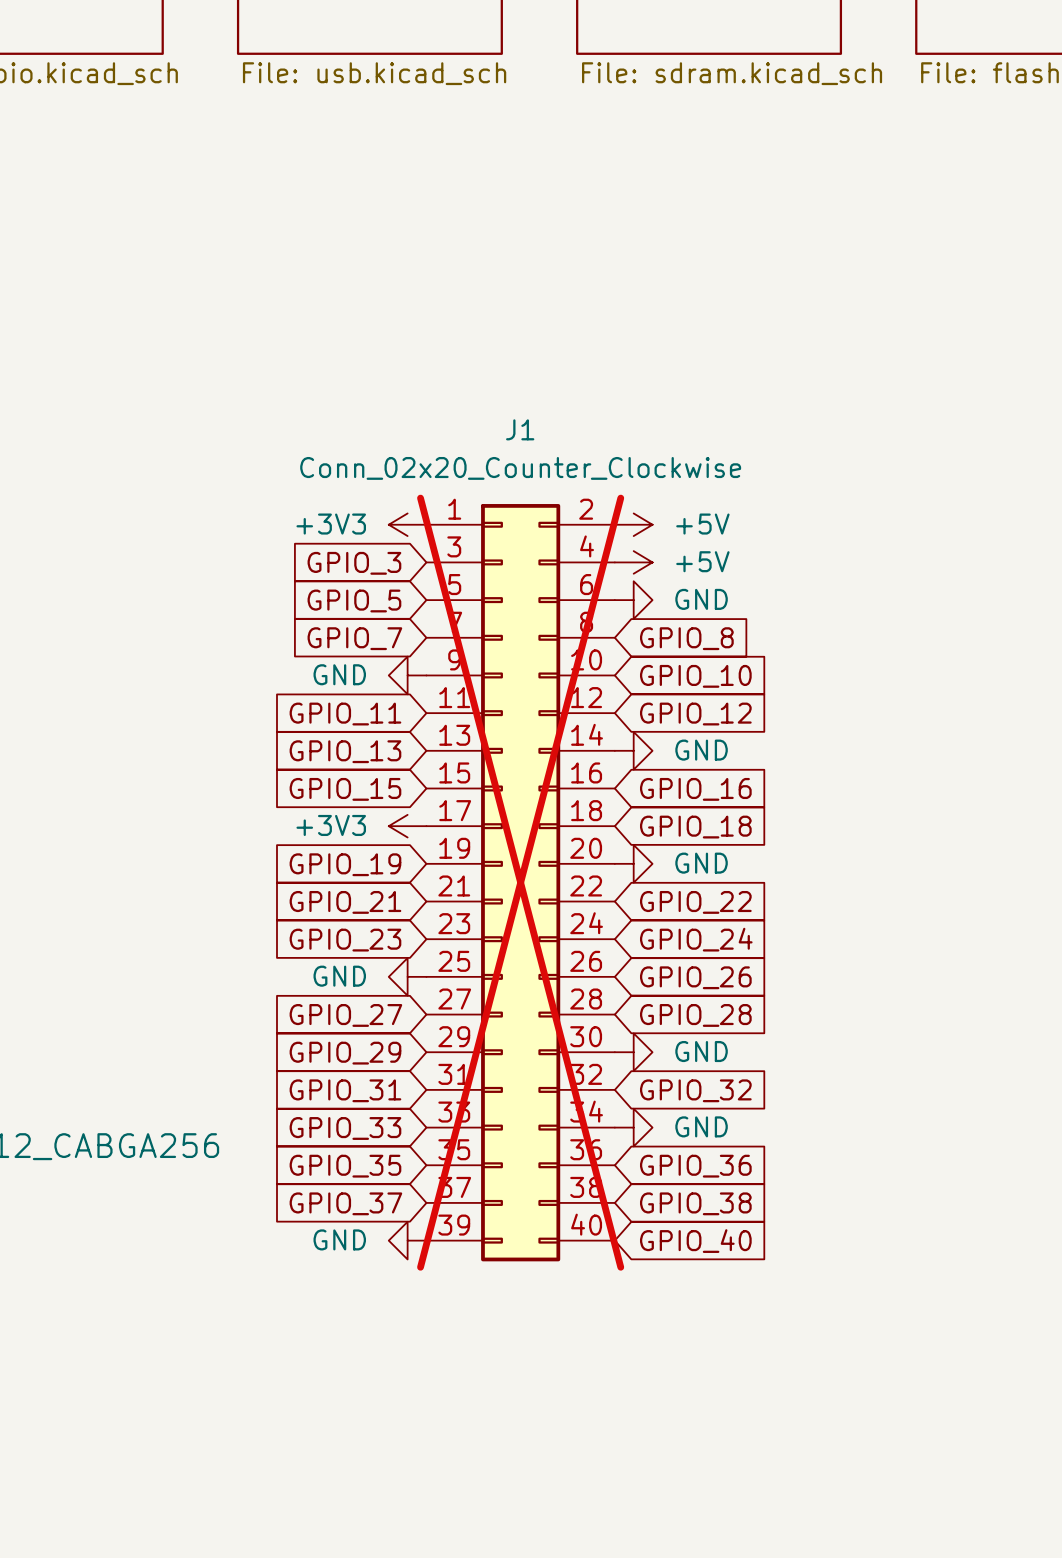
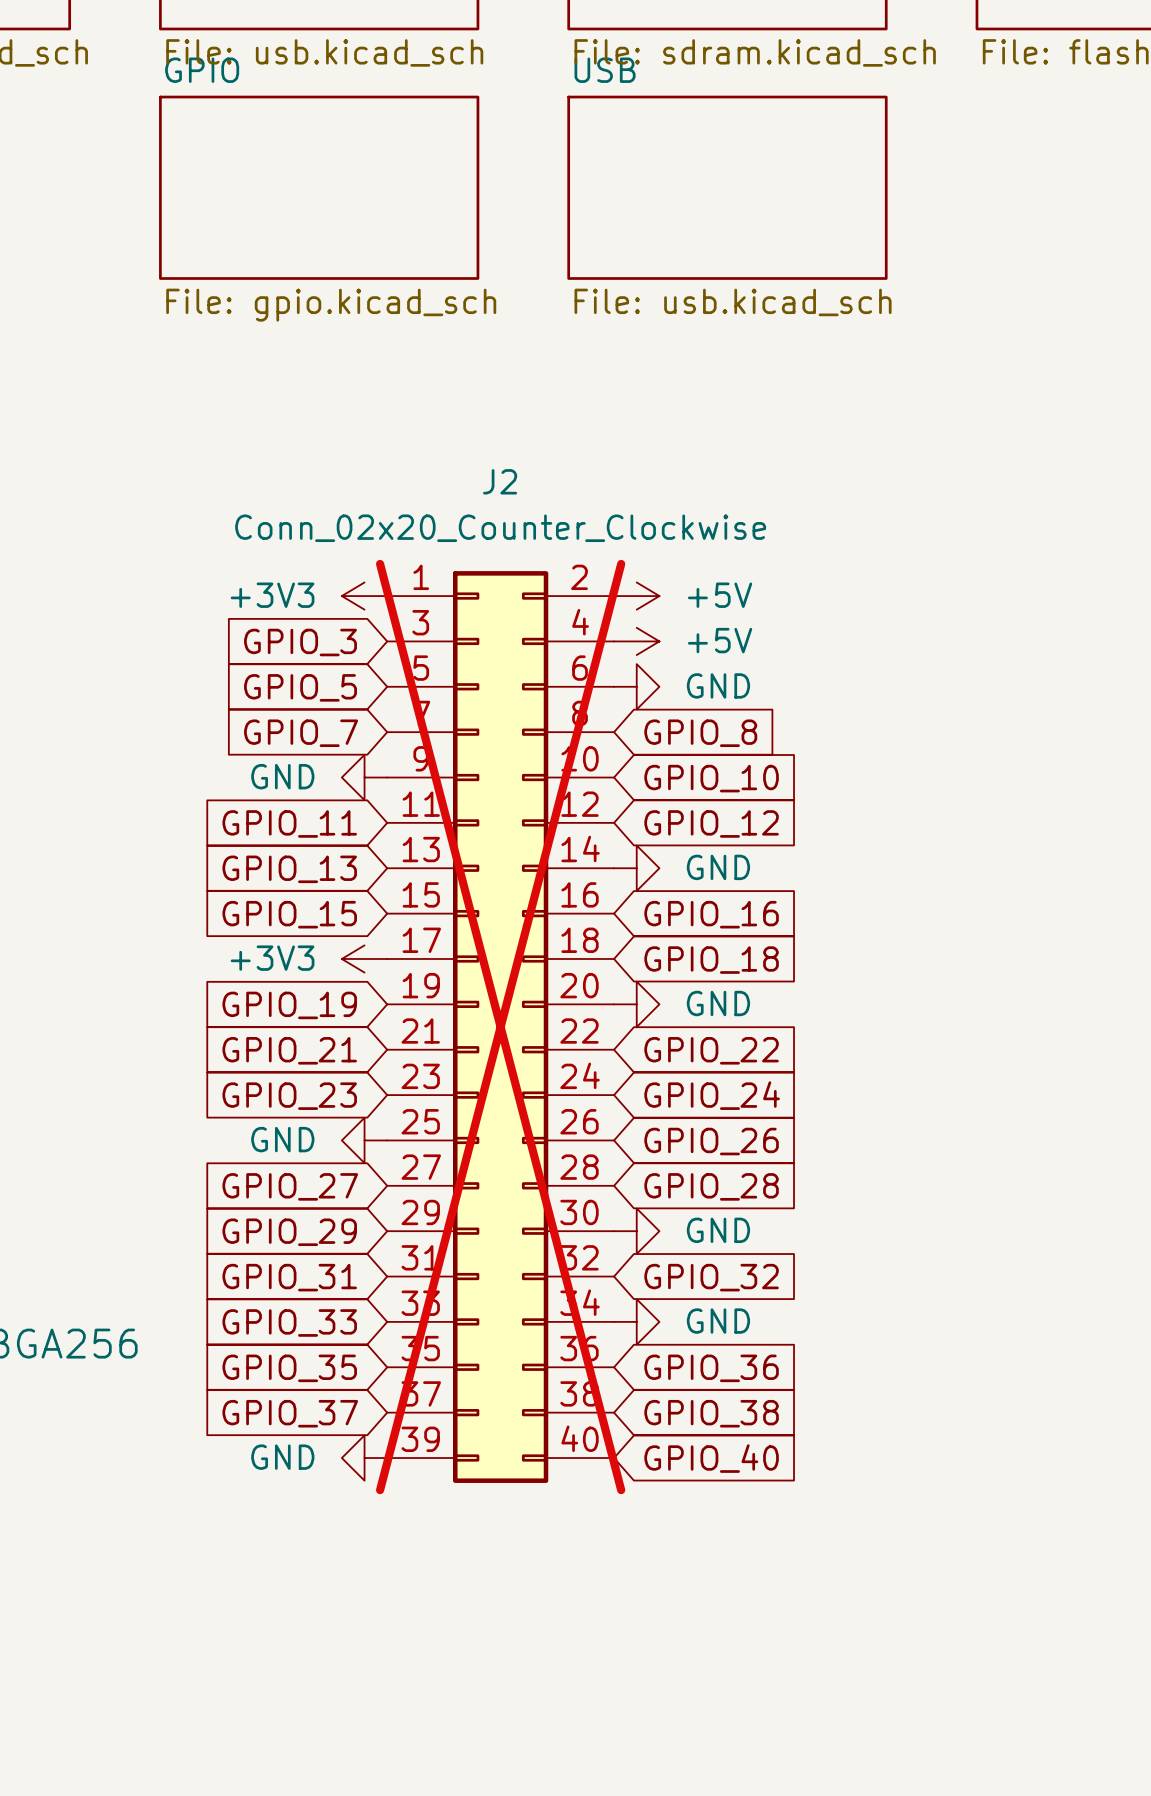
sheet GPIO: none -> File: gpio.kicad_sch (319, 187)
sheet USB: none -> File: usb.kicad_sch (727, 187)
J1 name: J1 (520, 429) -> J2 (500, 481)

